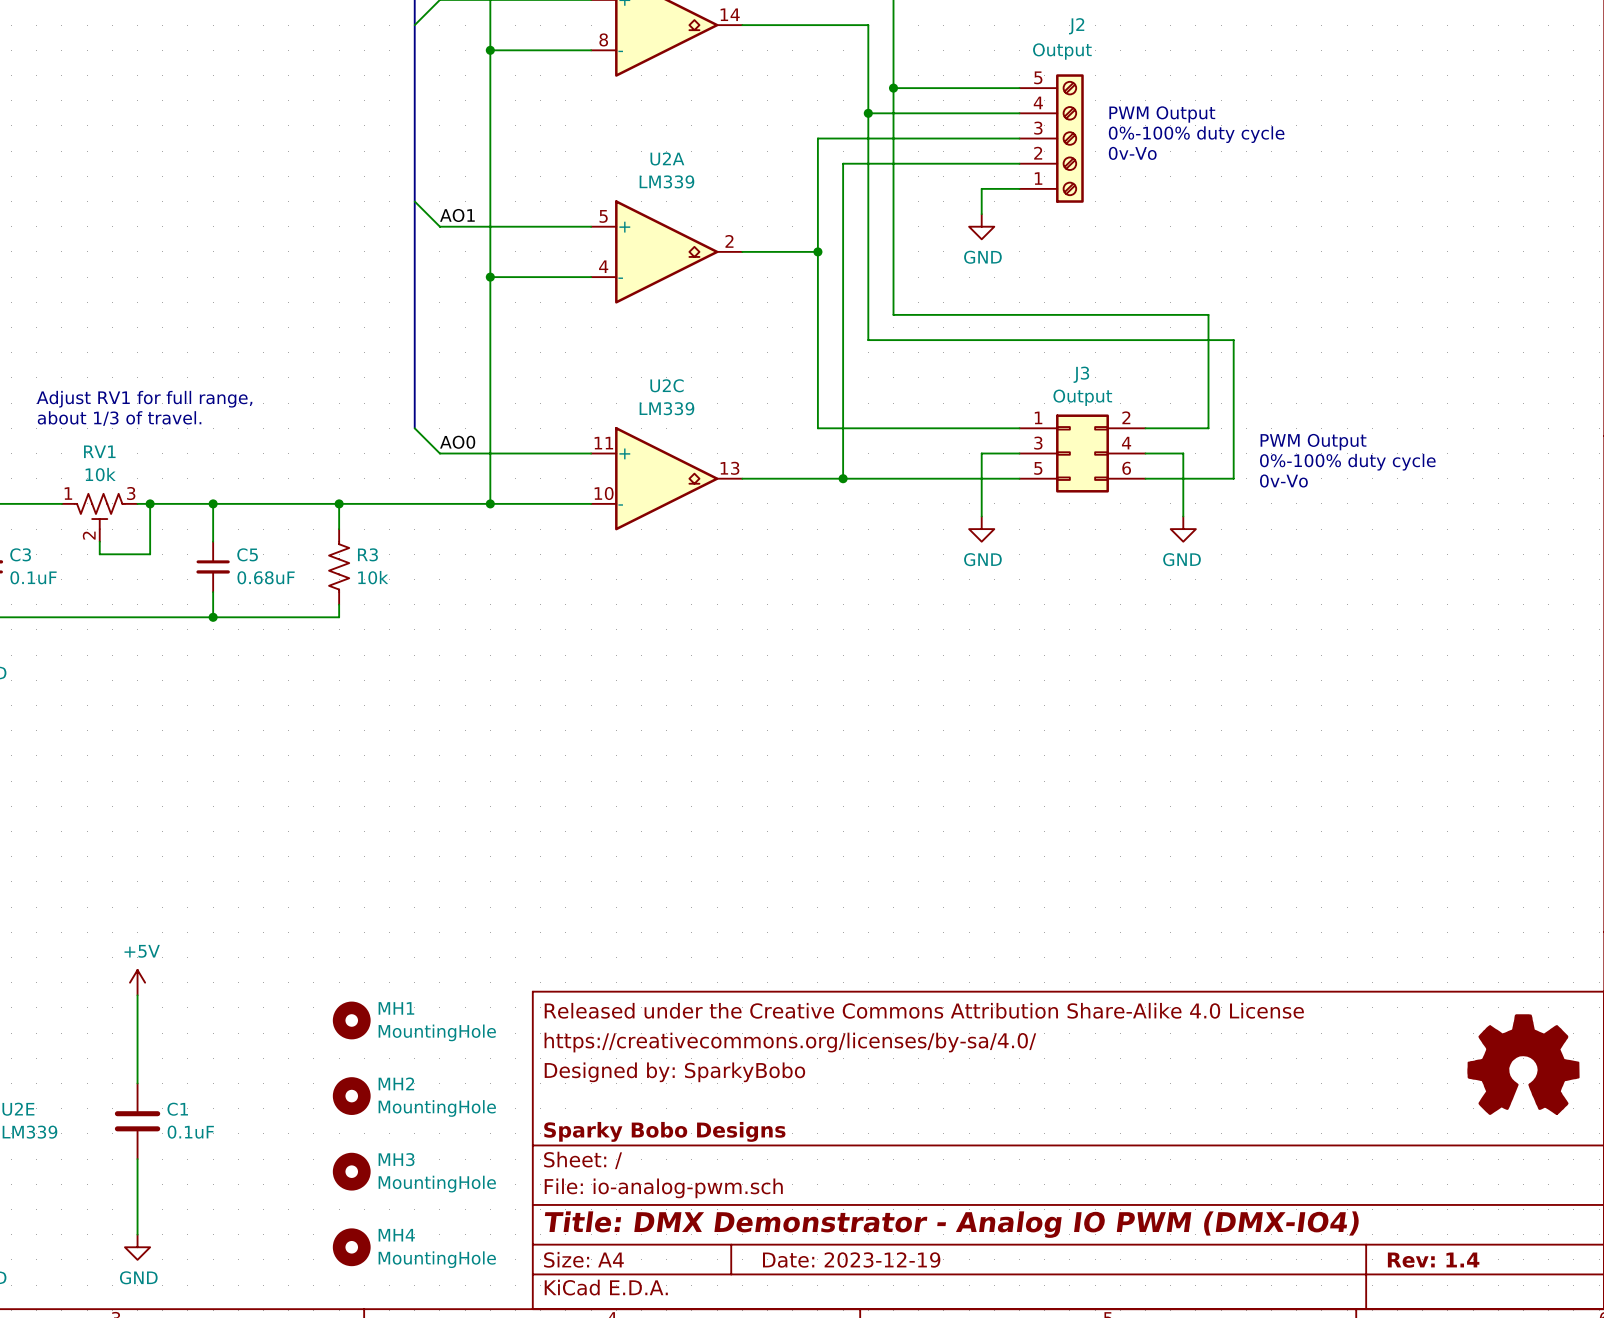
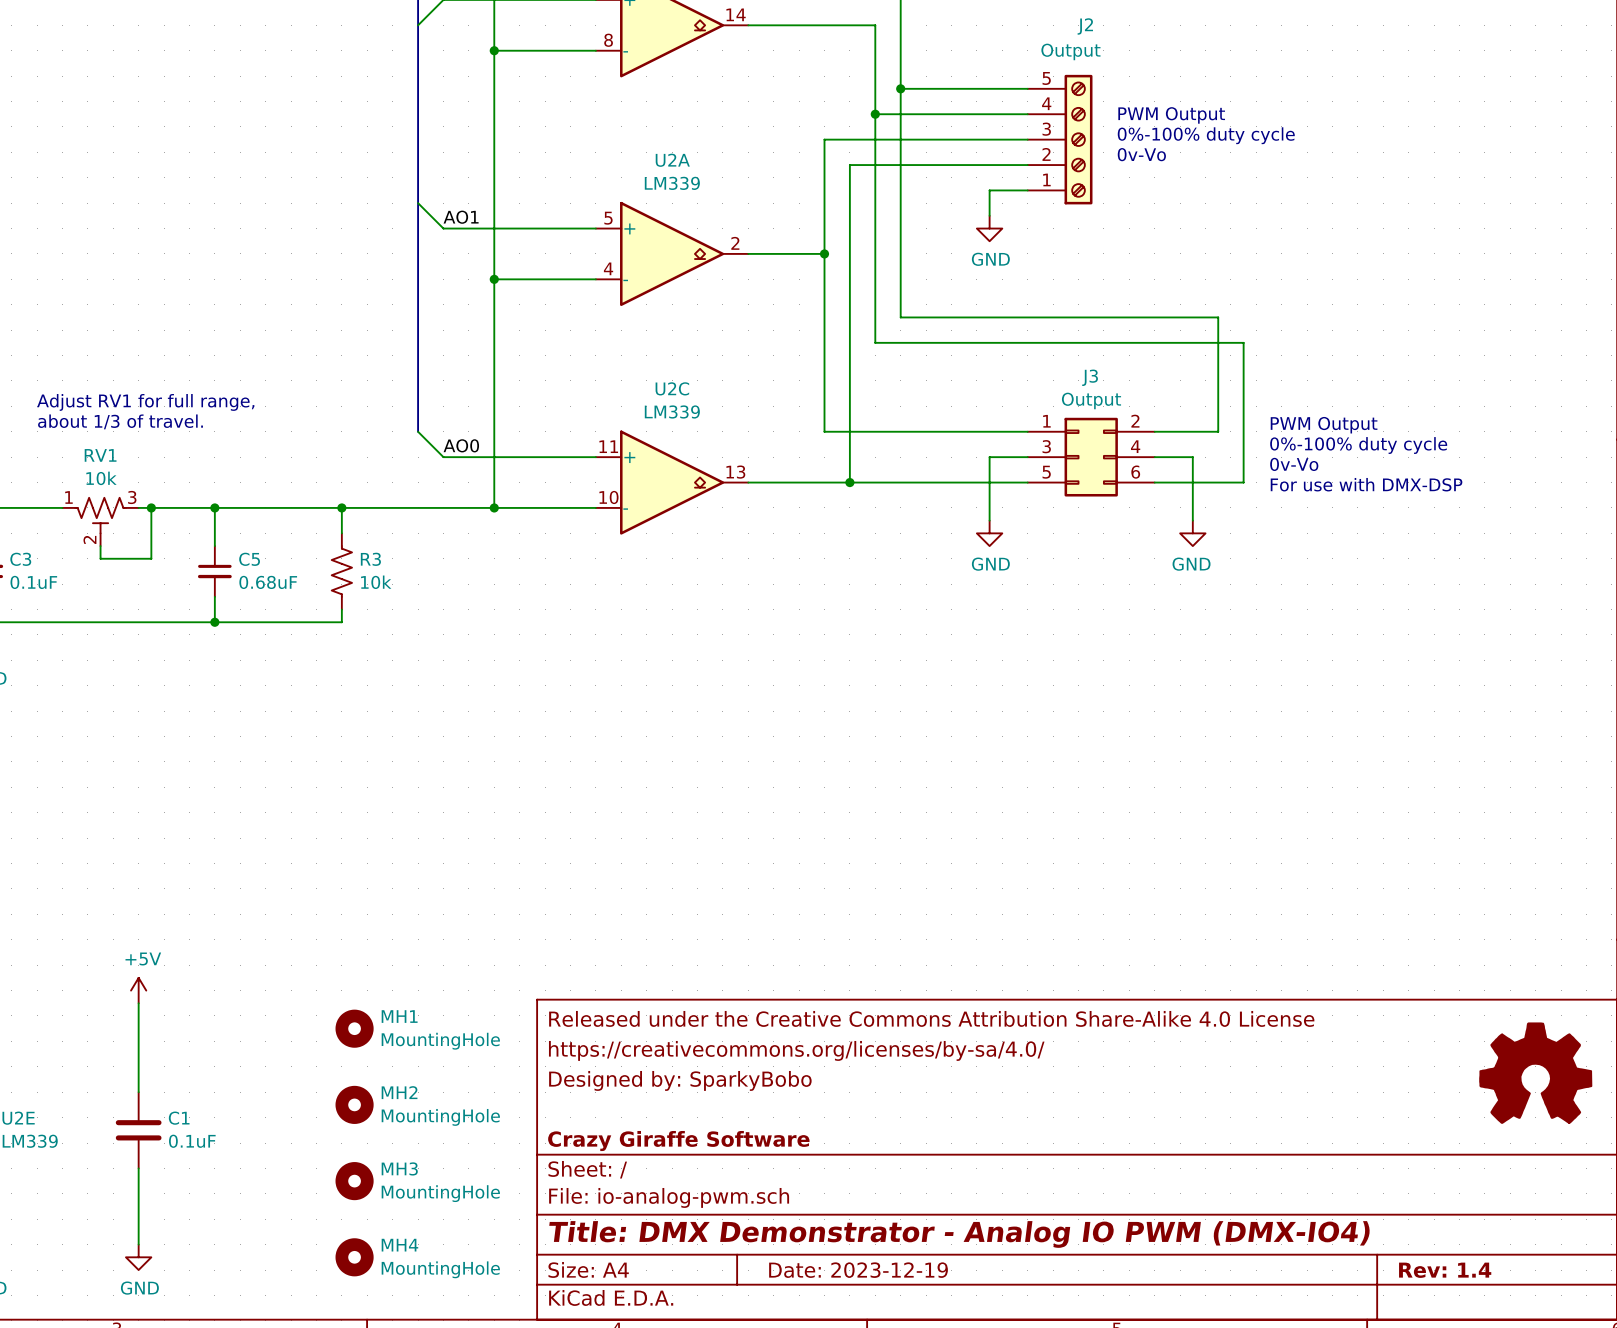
text: none -> PWM Output (1324, 425)
text: PWM Output (1313, 442) -> 0%-100% duty cycle (1358, 445)
text: 0%-100% duty cycle (1347, 462) -> 0v-Vo (1294, 464)
text: 0v-Vo (1283, 480) -> For use with DMX-DSP (1366, 484)
title block: Sparky Bobo Designs (664, 1131) -> Crazy Giraffe Software (678, 1141)

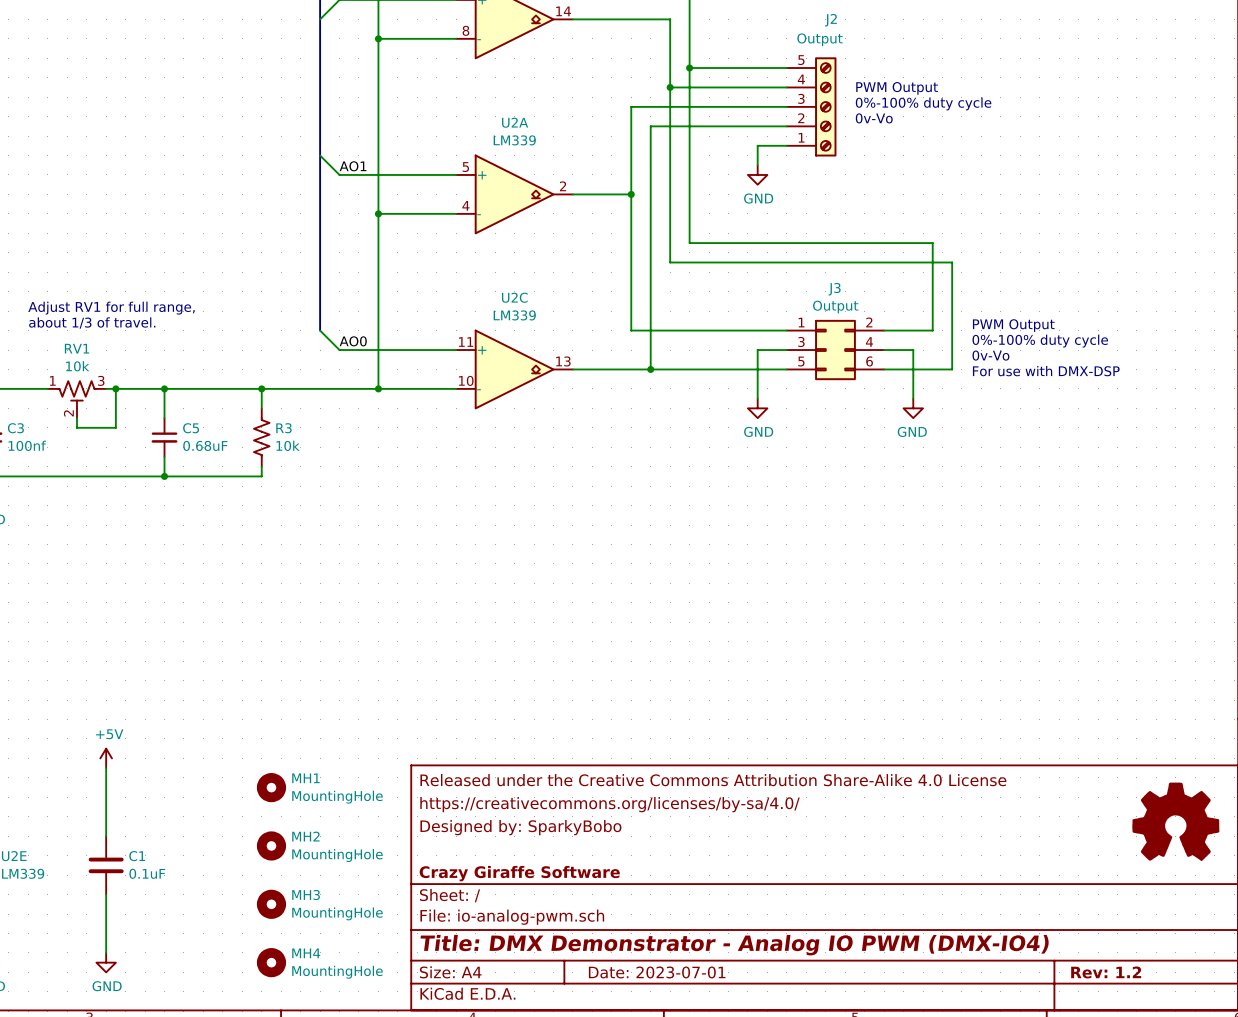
C3 value: 0.1uF (33, 582) -> 100nf (27, 445)
title block: Date: 2023-12-19 (858, 1270) -> Date: 2023-07-01 (657, 972)
title block: Rev: 1.4 (1445, 1270) -> Rev: 1.2 (1106, 972)

